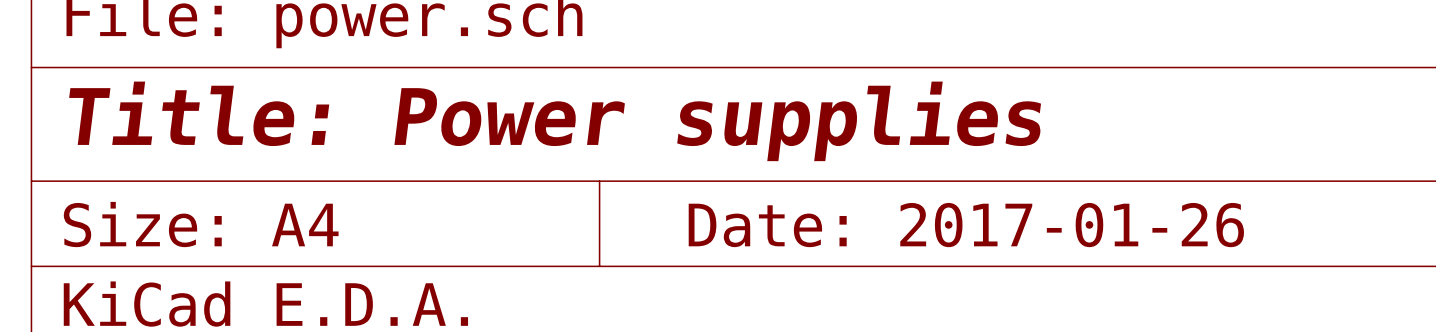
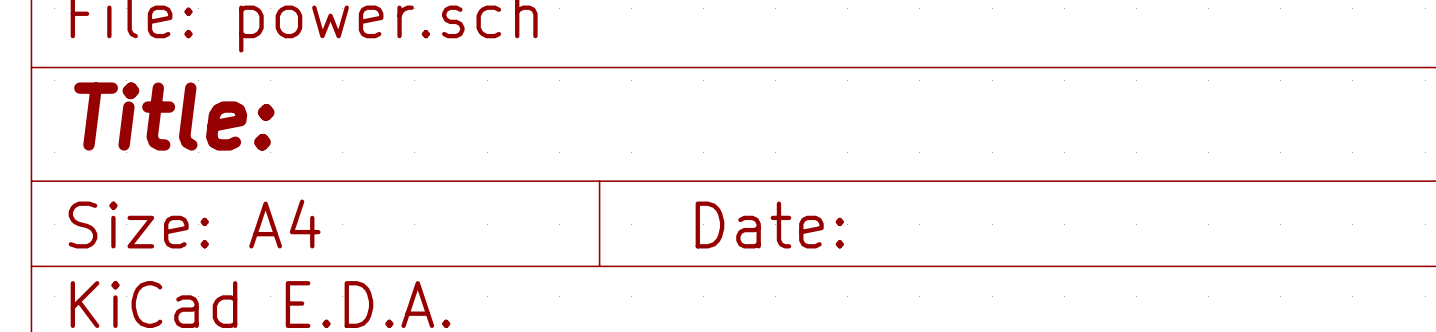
title block: Title: Power supplies (555, 121) -> Title: (174, 116)
title block: Date: 2017-01-26 (966, 225) -> Date: (769, 225)

